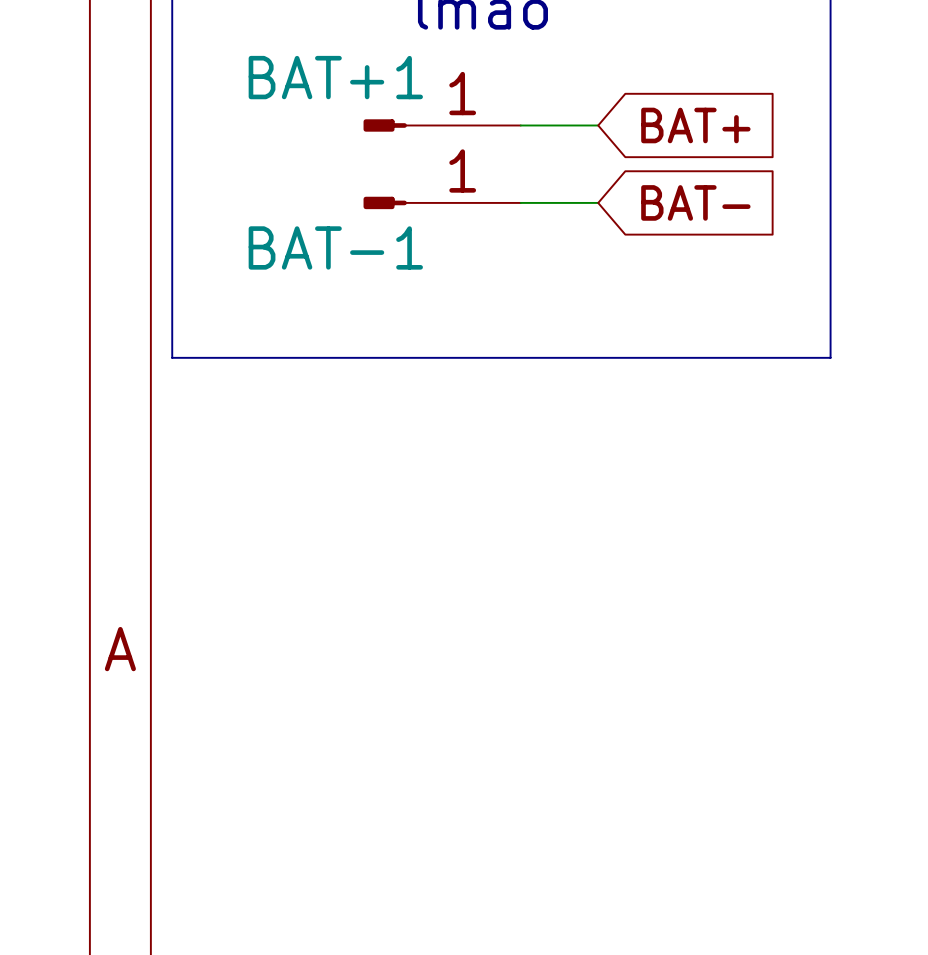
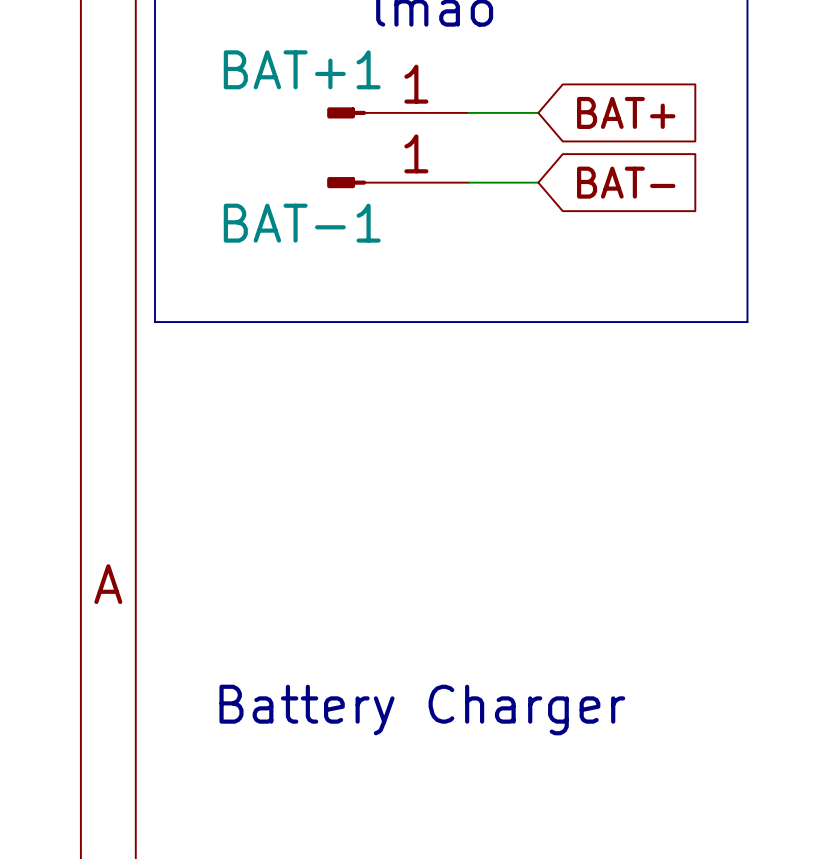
text: none -> Battery Charger (422, 710)

